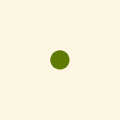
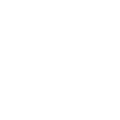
junction: (59, 59) -> none

